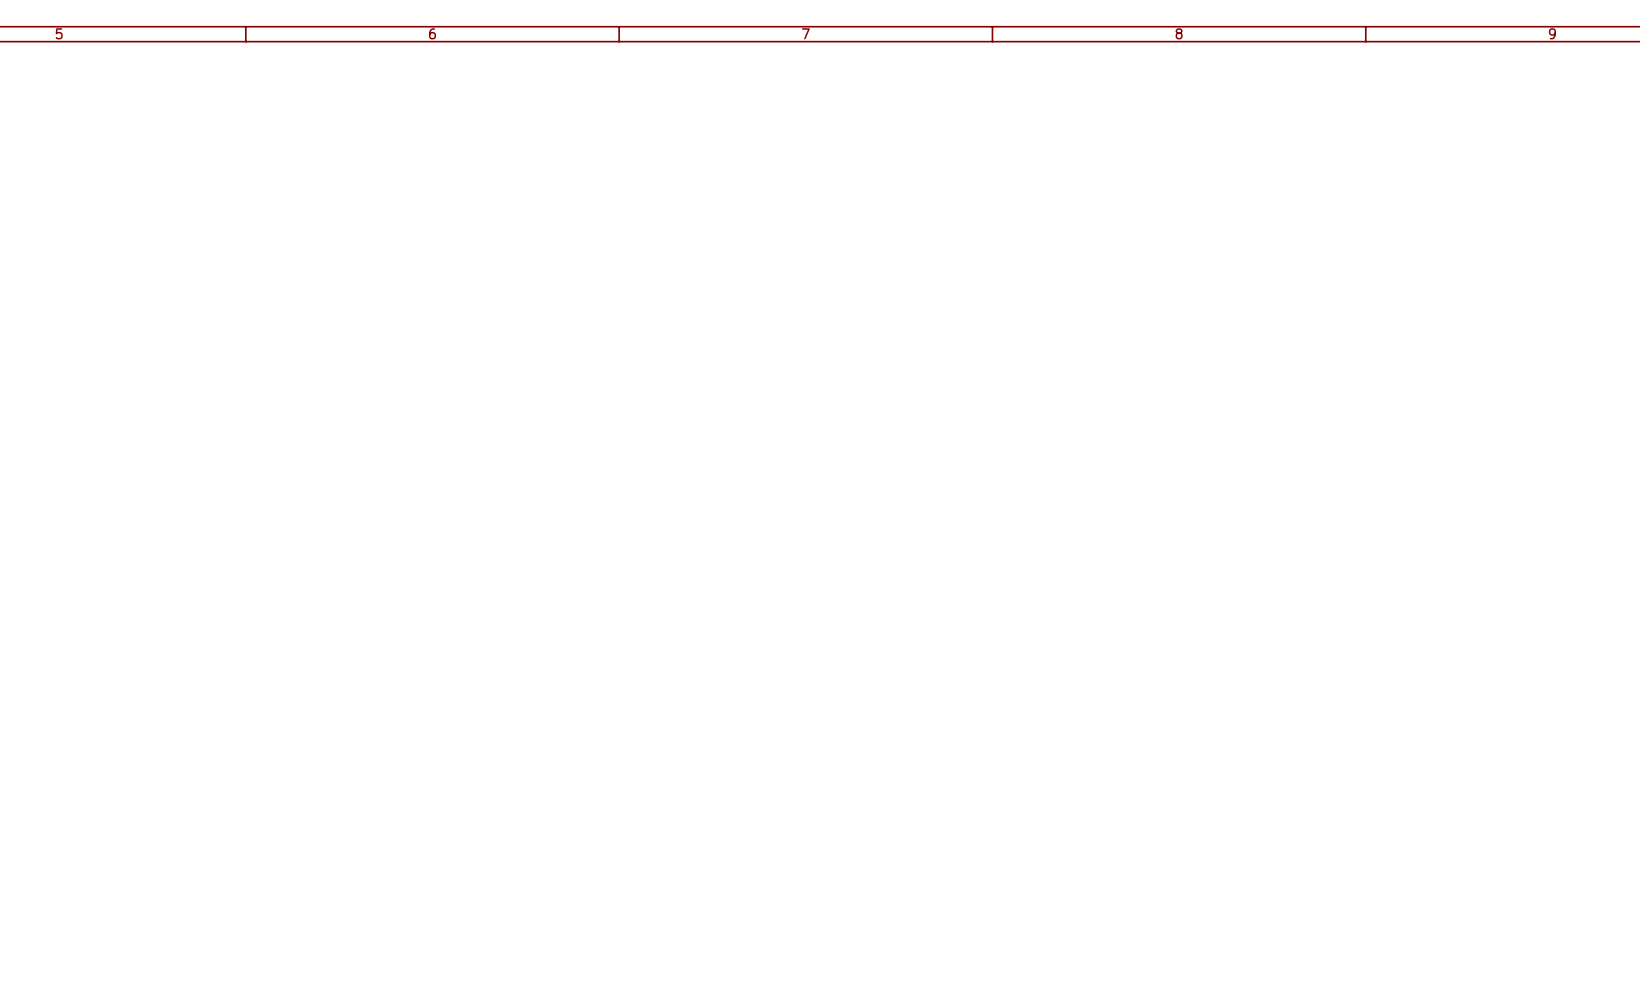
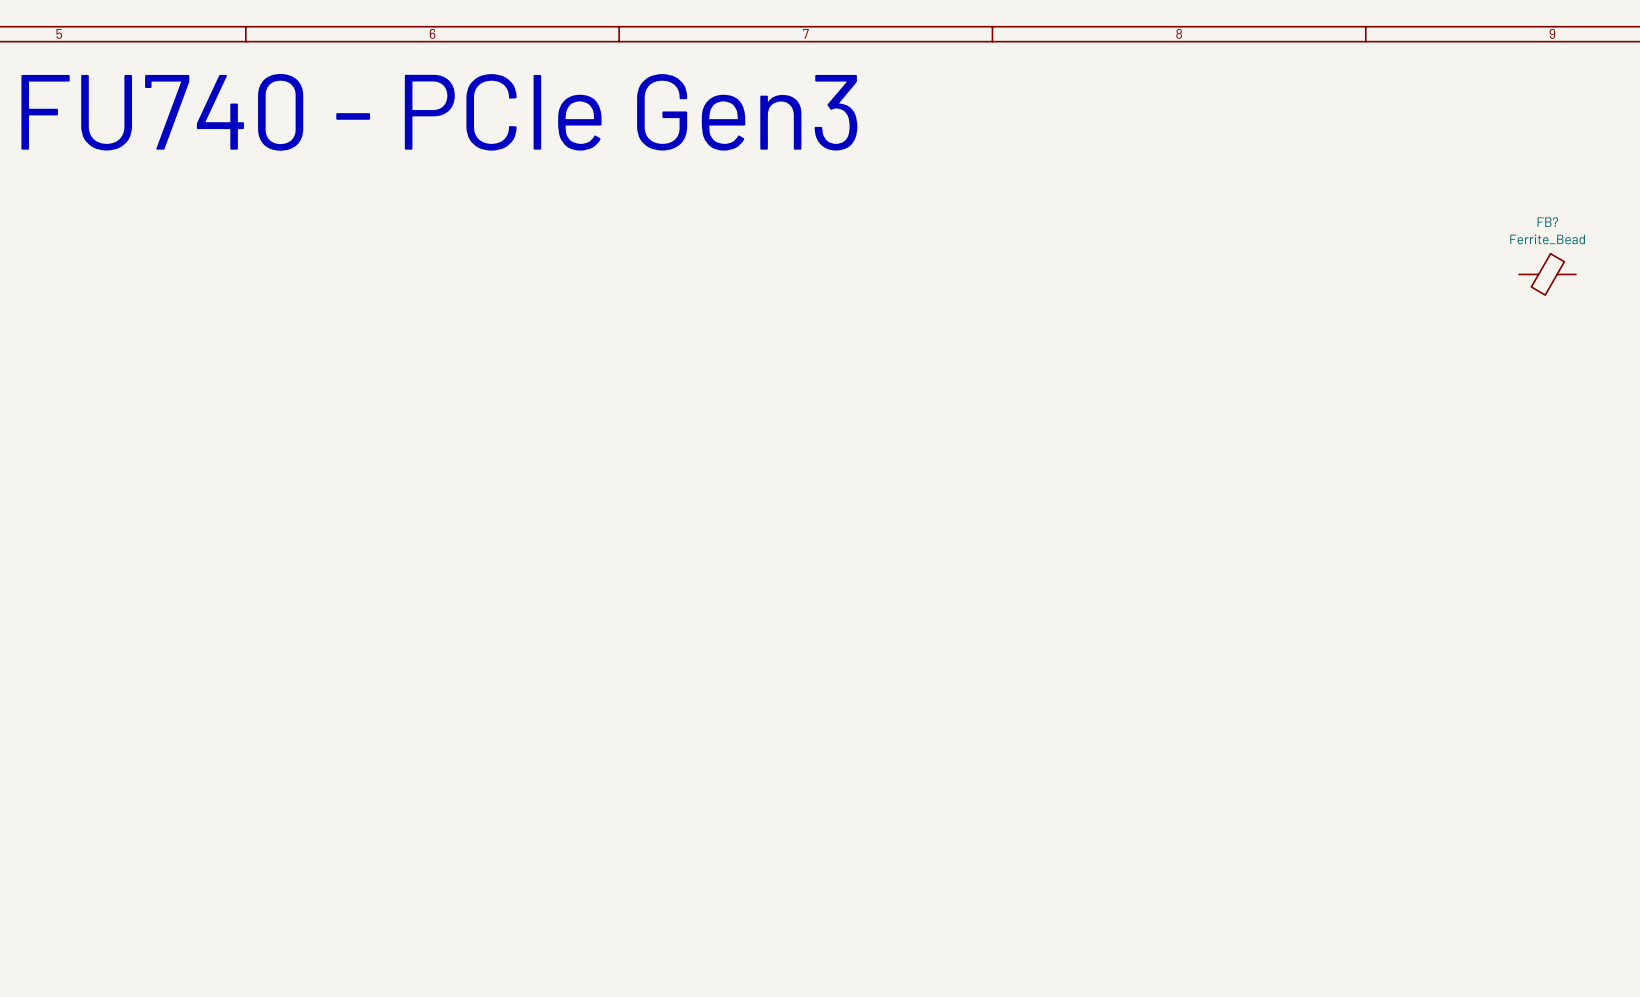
text: none -> FU740 - PCIe Gen3 (439, 112)
FB?: none -> Ferrite_Bead (1547, 274)

